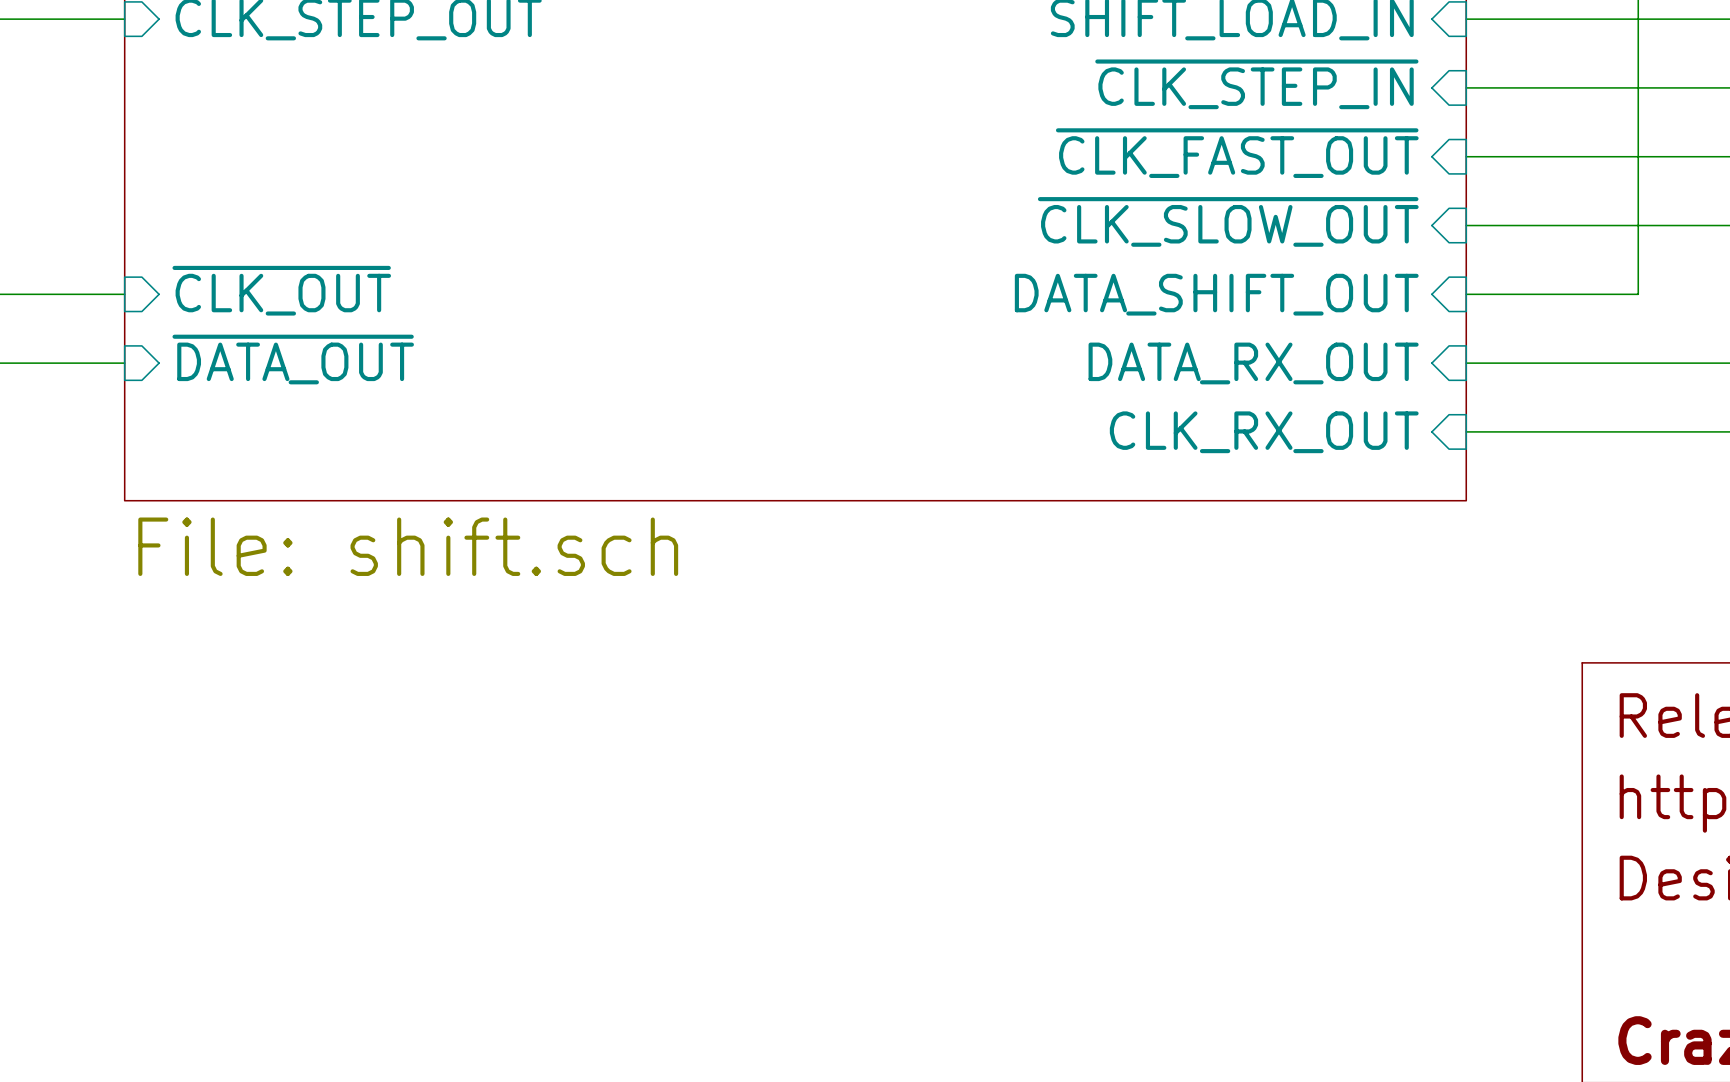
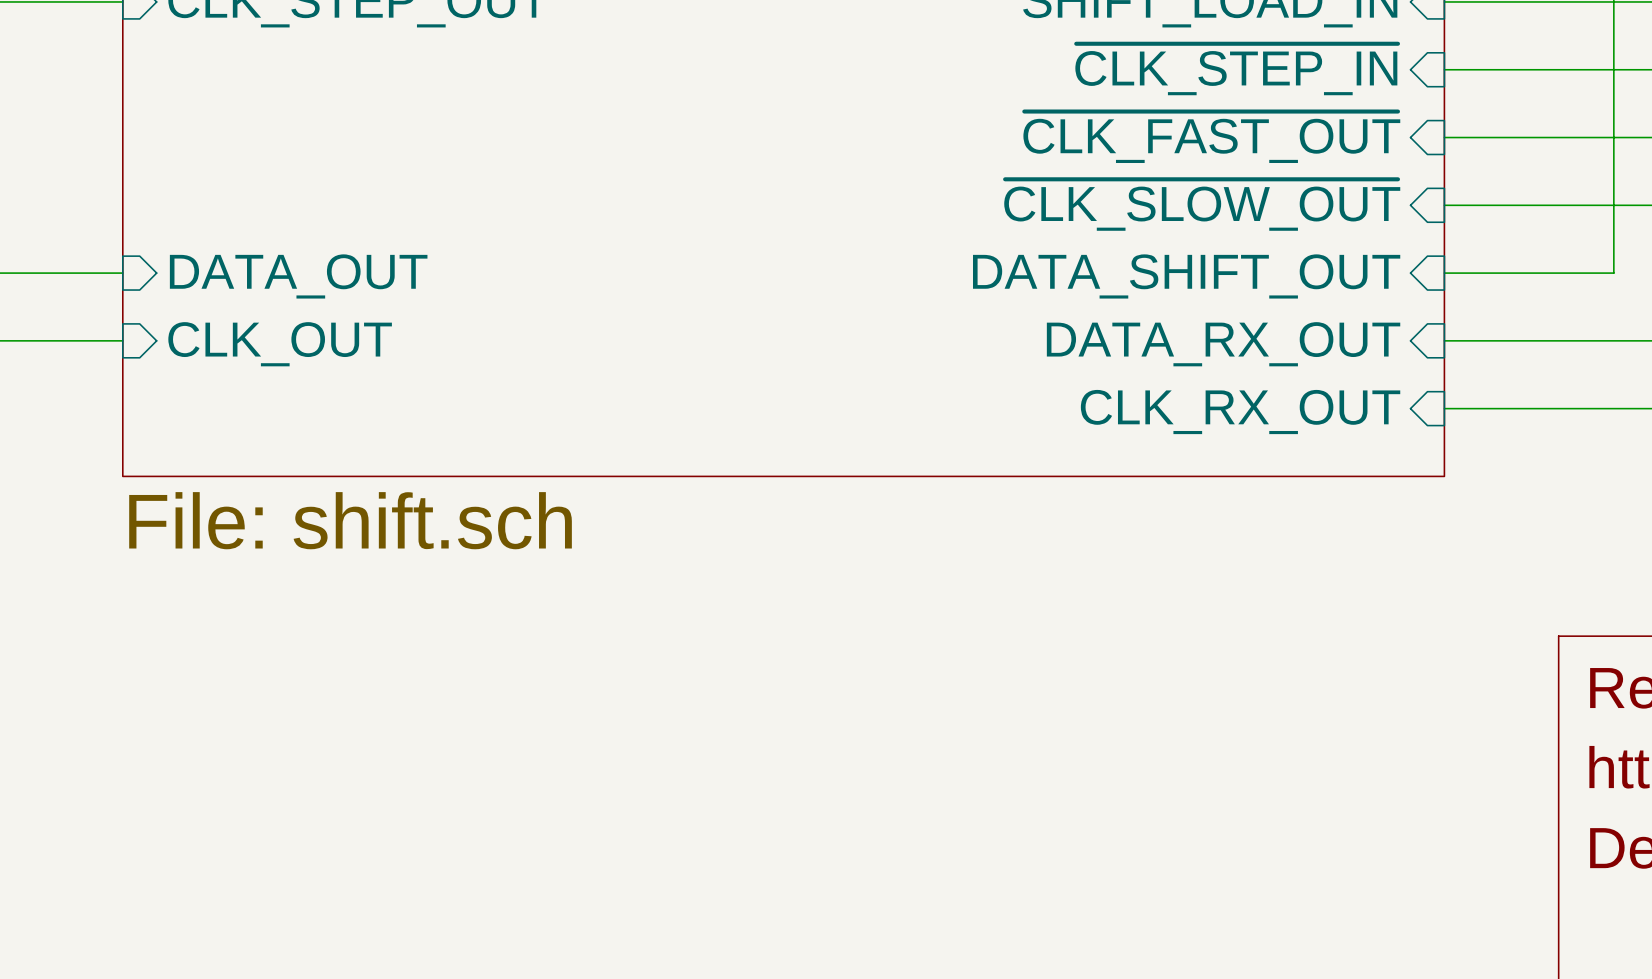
sheet pin: ~{CLK_OUT} (281, 290) -> DATA_OUT (298, 276)
sheet pin: ~{DATA_OUT} (293, 359) -> CLK_OUT (280, 344)

